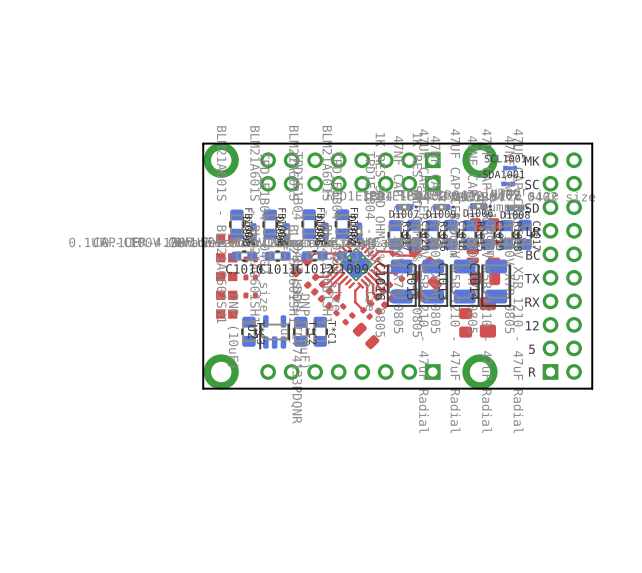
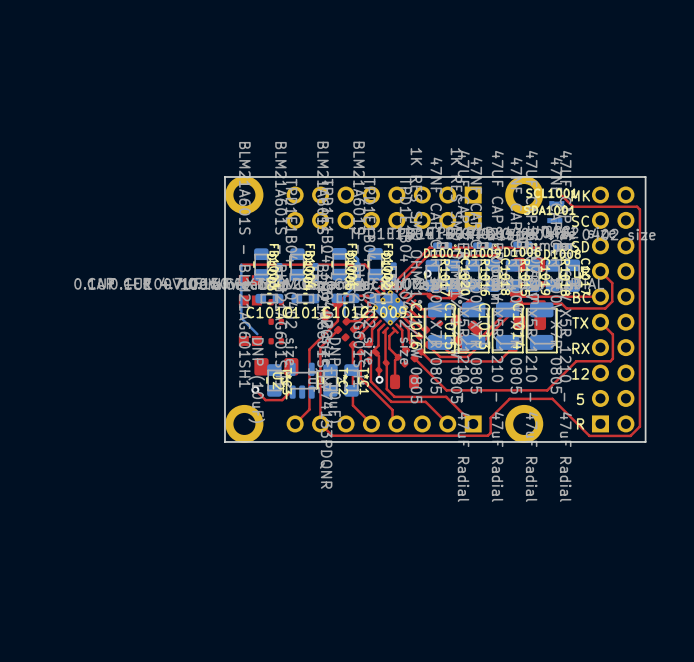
top track: none -> (561, 195) (572, 206) (637, 206) (639, 209) (639, 426) (630, 435) (589, 435) (552, 398) (509, 398) (490, 417) (490, 432) (487, 435) (332, 435) (320, 423) (320, 347) (338, 329)
top track: none -> (539, 247) (429, 247) (395, 282) (395, 285)
bottom track: none -> (355, 256) (358, 259) (358, 282) (344, 296) (344, 315)
top track: none -> (499, 259) (495, 255) (427, 255) (402, 281) (402, 285) (398, 288)
top track: none -> (241, 264) (365, 264) (385, 285)
bottom track: none -> (241, 264) (241, 318) (257, 334)
top track: none -> (600, 271) (612, 283) (612, 301) (605, 308) (566, 308) (561, 303) (521, 303) (467, 356) (440, 356) (427, 344)
via: none -> (427, 273)
top track: none -> (600, 296) (521, 296) (465, 352) (448, 352) (434, 338)
top track: none -> (337, 303) (337, 321) (309, 349) (309, 409) (295, 423)
part: (226, 276) -> none
top track: none -> (600, 322) (612, 334) (612, 358) (610, 361) (576, 361) (547, 390) (446, 390) (414, 358)
top track: none -> (381, 326) (378, 330) (378, 345) (370, 353) (370, 381) (391, 401) (425, 401) (447, 423)
top track: none -> (385, 330) (386, 389) (394, 396) (446, 396) (473, 423)
top track: none -> (352, 344) (352, 405) (371, 423)
top track: none -> (516, 350) (509, 350) (499, 361) (431, 361) (421, 351)
top track: none -> (360, 352) (360, 378) (392, 410) (392, 419) (396, 423)
top track: none -> (378, 355) (379, 379)
top track: none -> (398, 357) (395, 360) (395, 381)
part: (226, 314) -> none
part: (487, 317) -> none
part: none -> (276, 366)
part: (465, 322) -> none
via: none -> (379, 379)
part rotation: 0° (366, 335) -> 45° counterclockwise (404, 381)
via: none -> (255, 389)
top track: none -> (292, 389) (282, 400) (265, 400) (255, 389)

